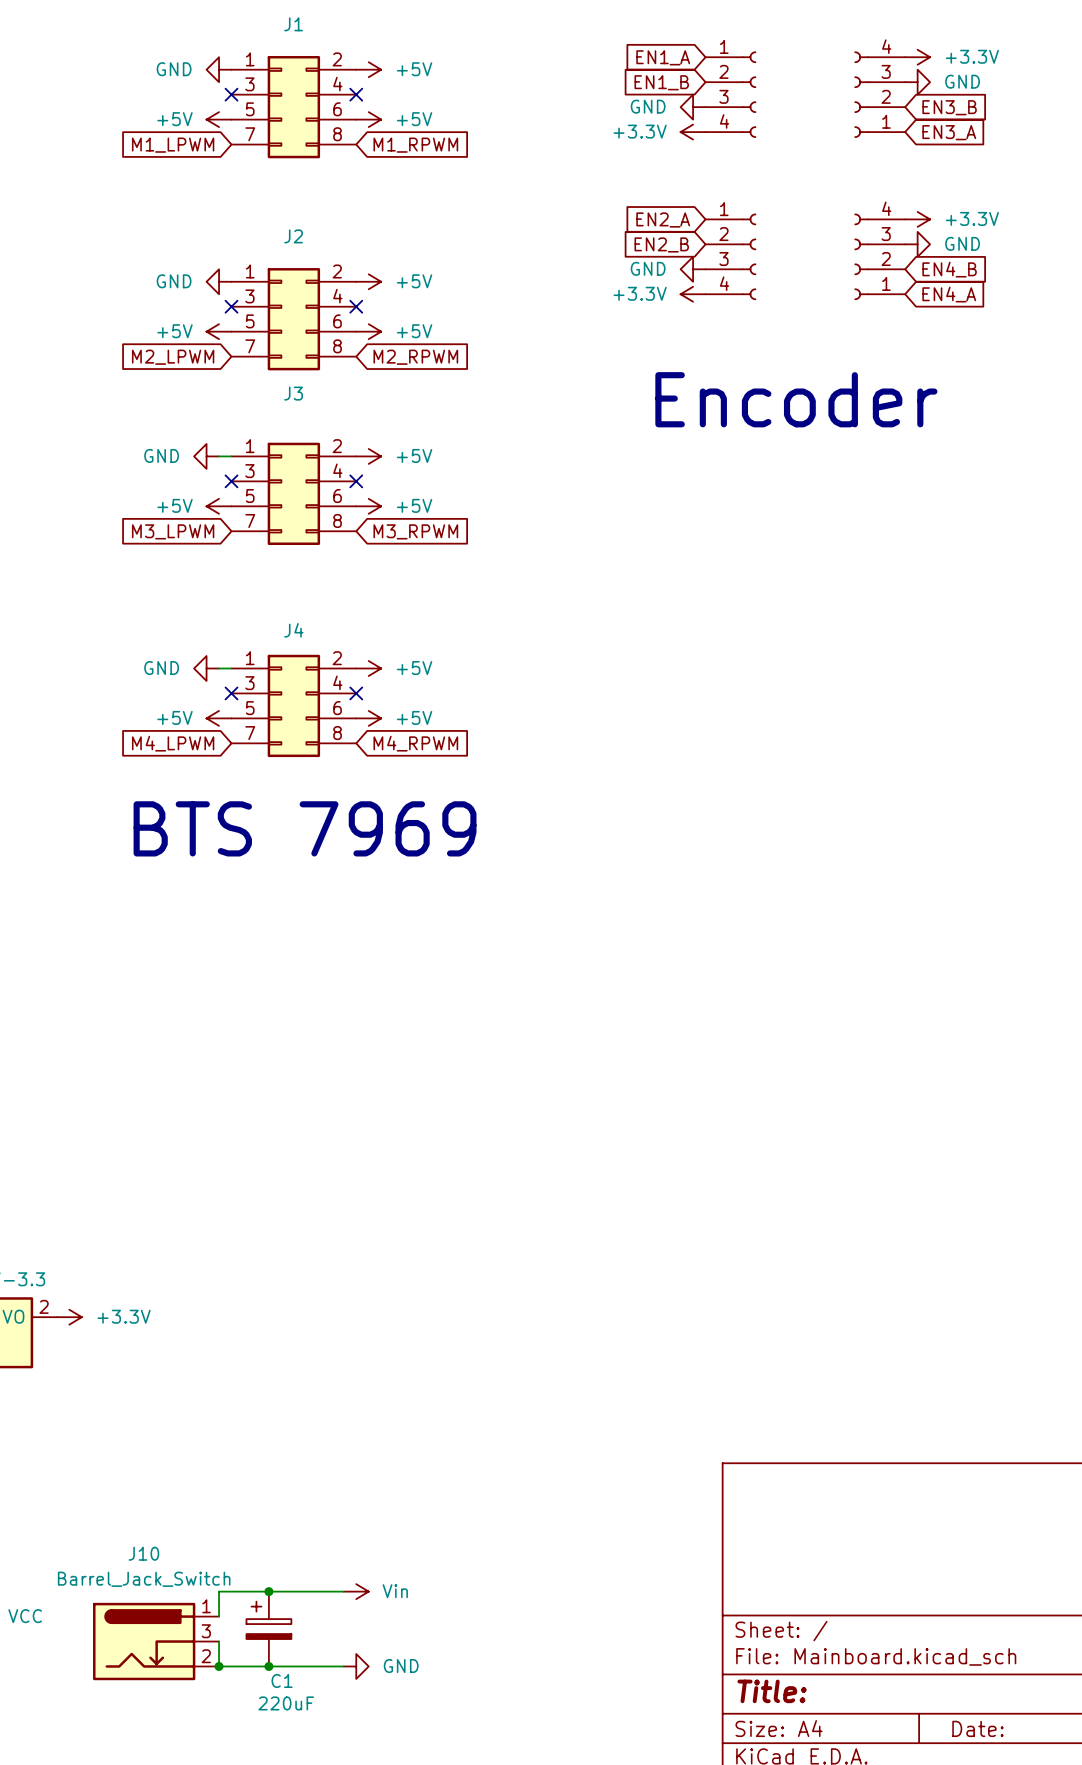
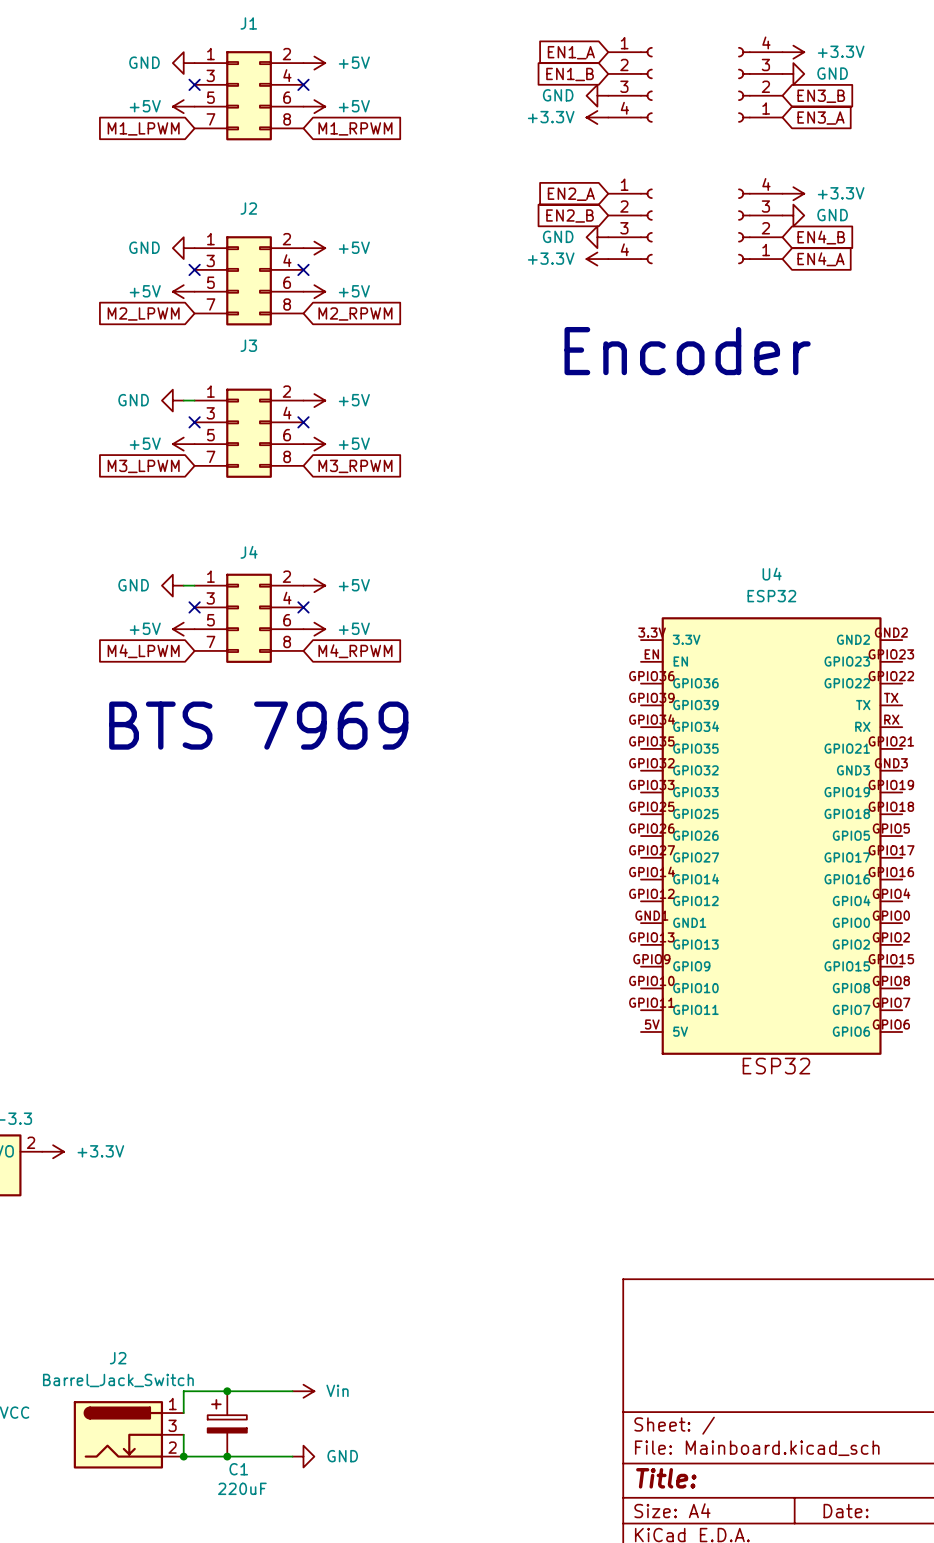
U4: none -> ESP32 (771, 836)
J10 name: J10 (143, 1553) -> J2 (118, 1358)

